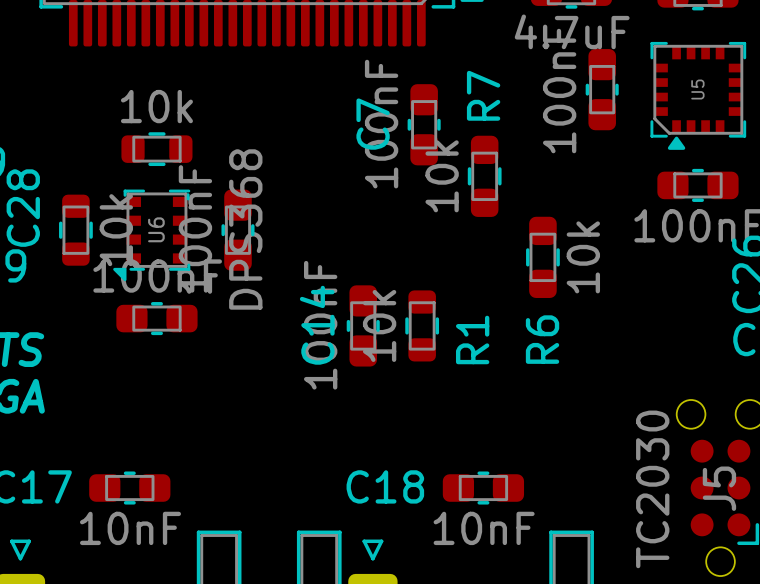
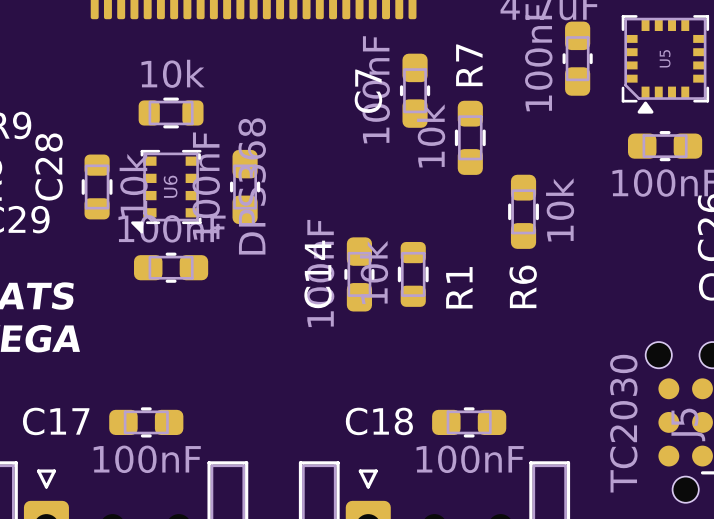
C17 value: 10nF (130, 528) -> 100nF (147, 459)
C18 value: 10nF (484, 528) -> 100nF (470, 459)

